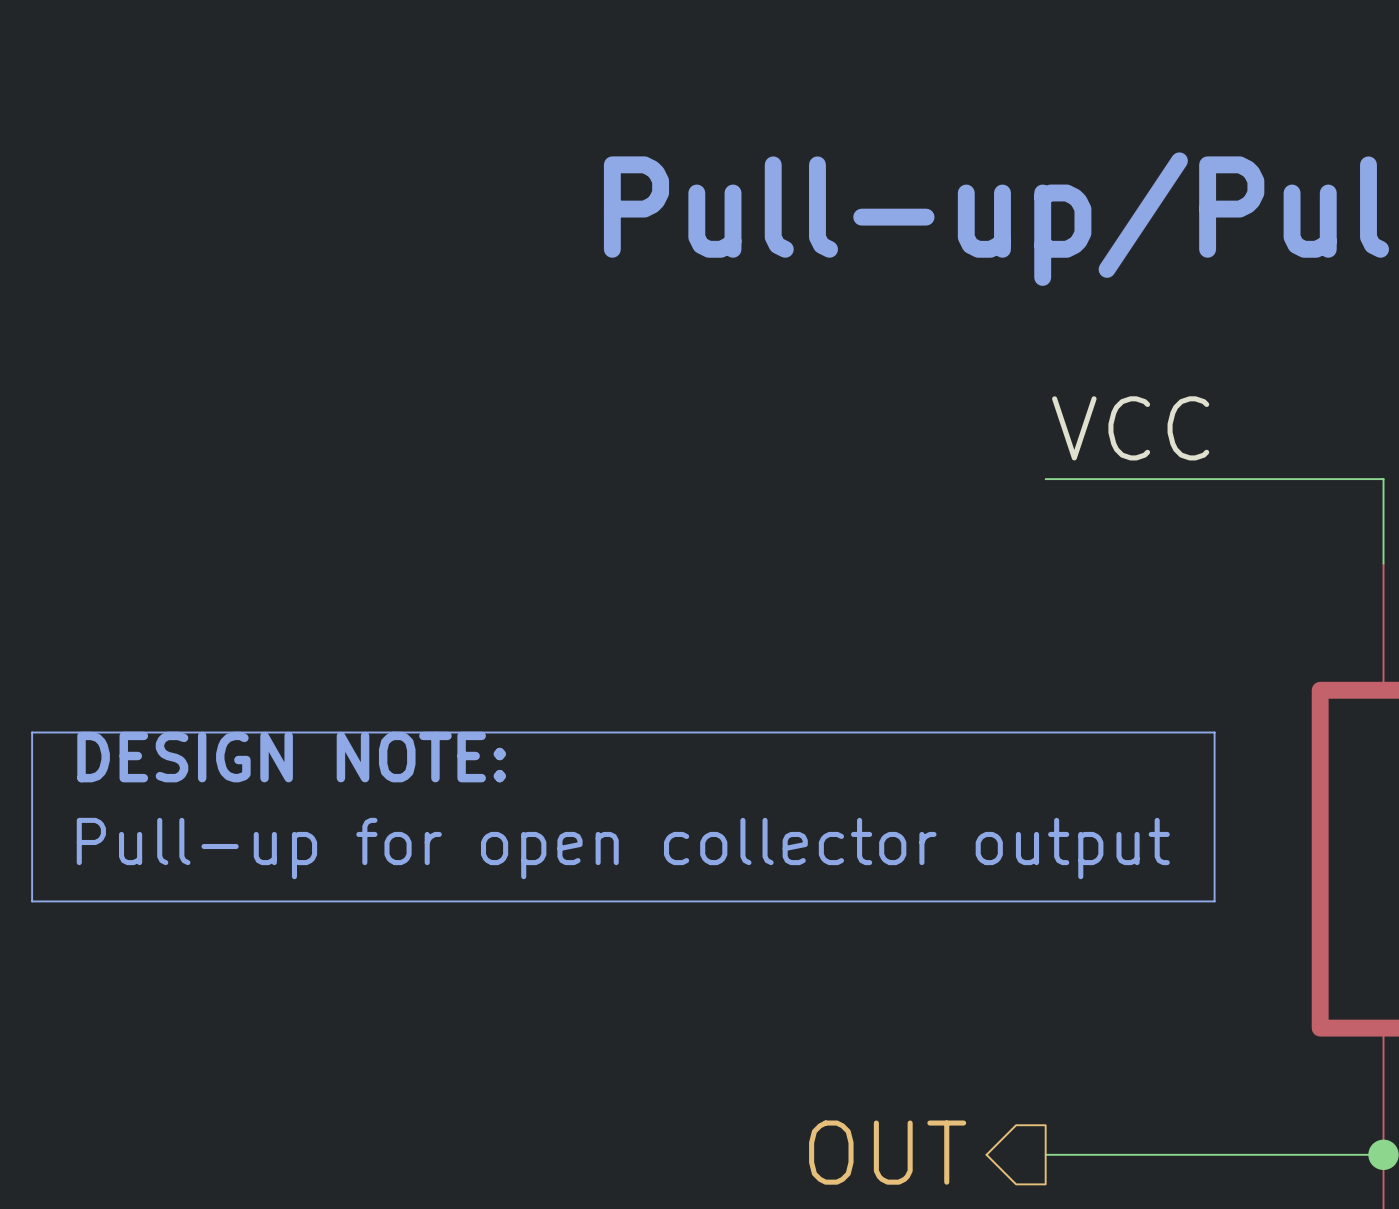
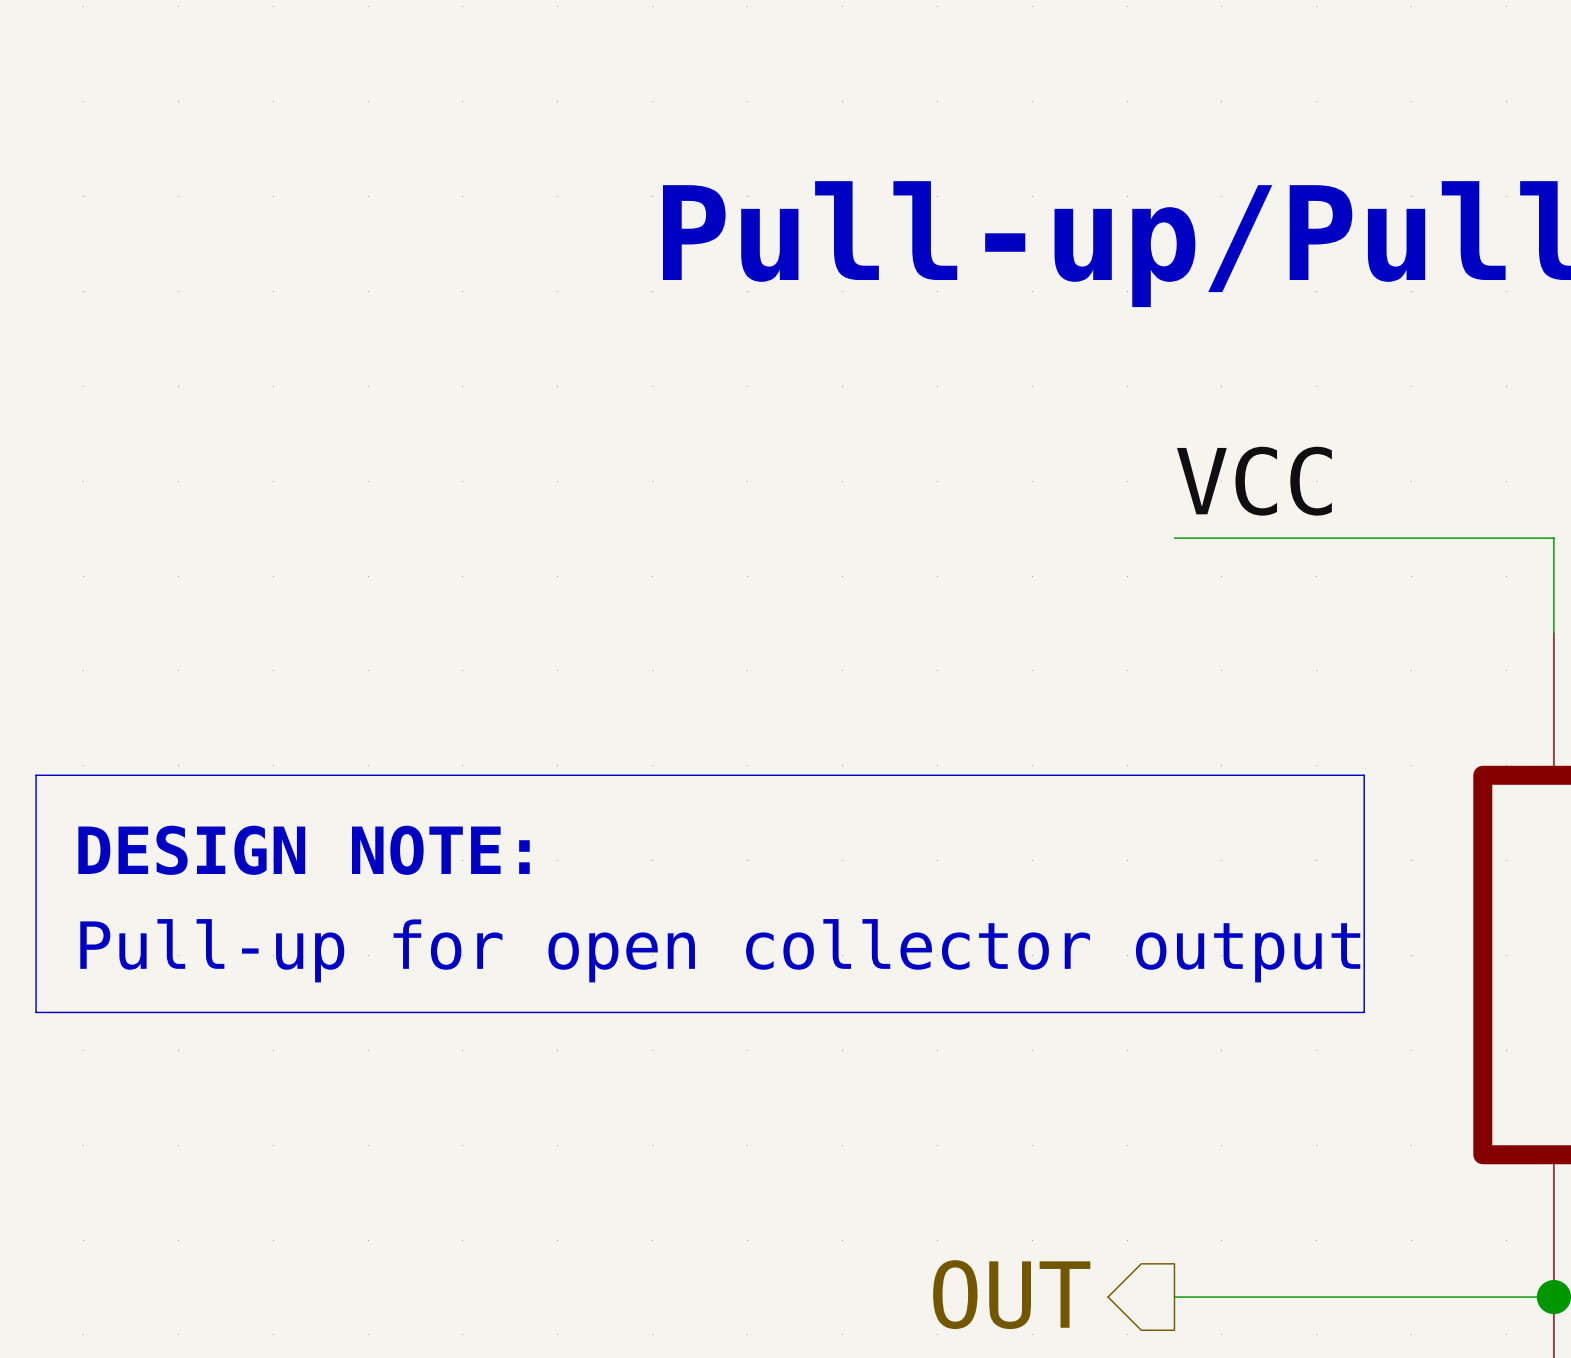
line: (32, 732) (1214, 732) -> (36, 822) (36, 775) (1364, 775) (1364, 822)

